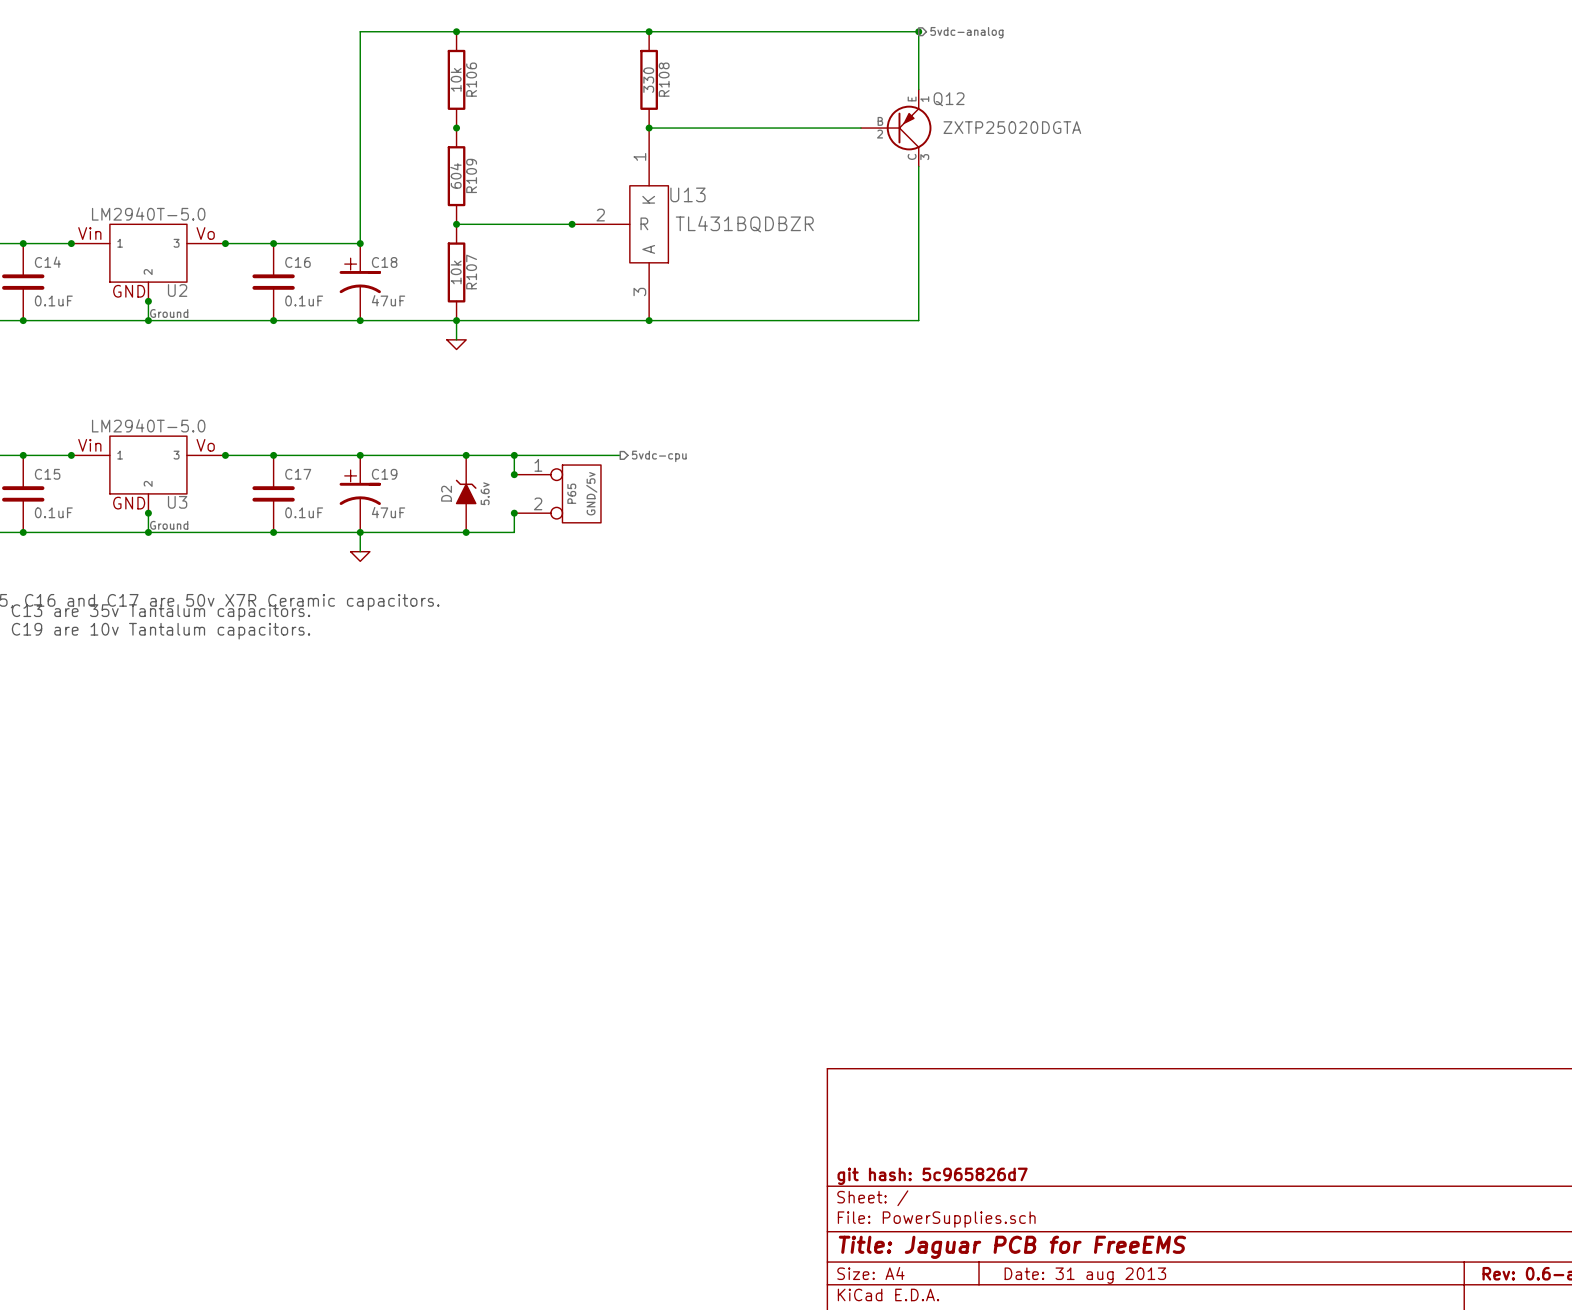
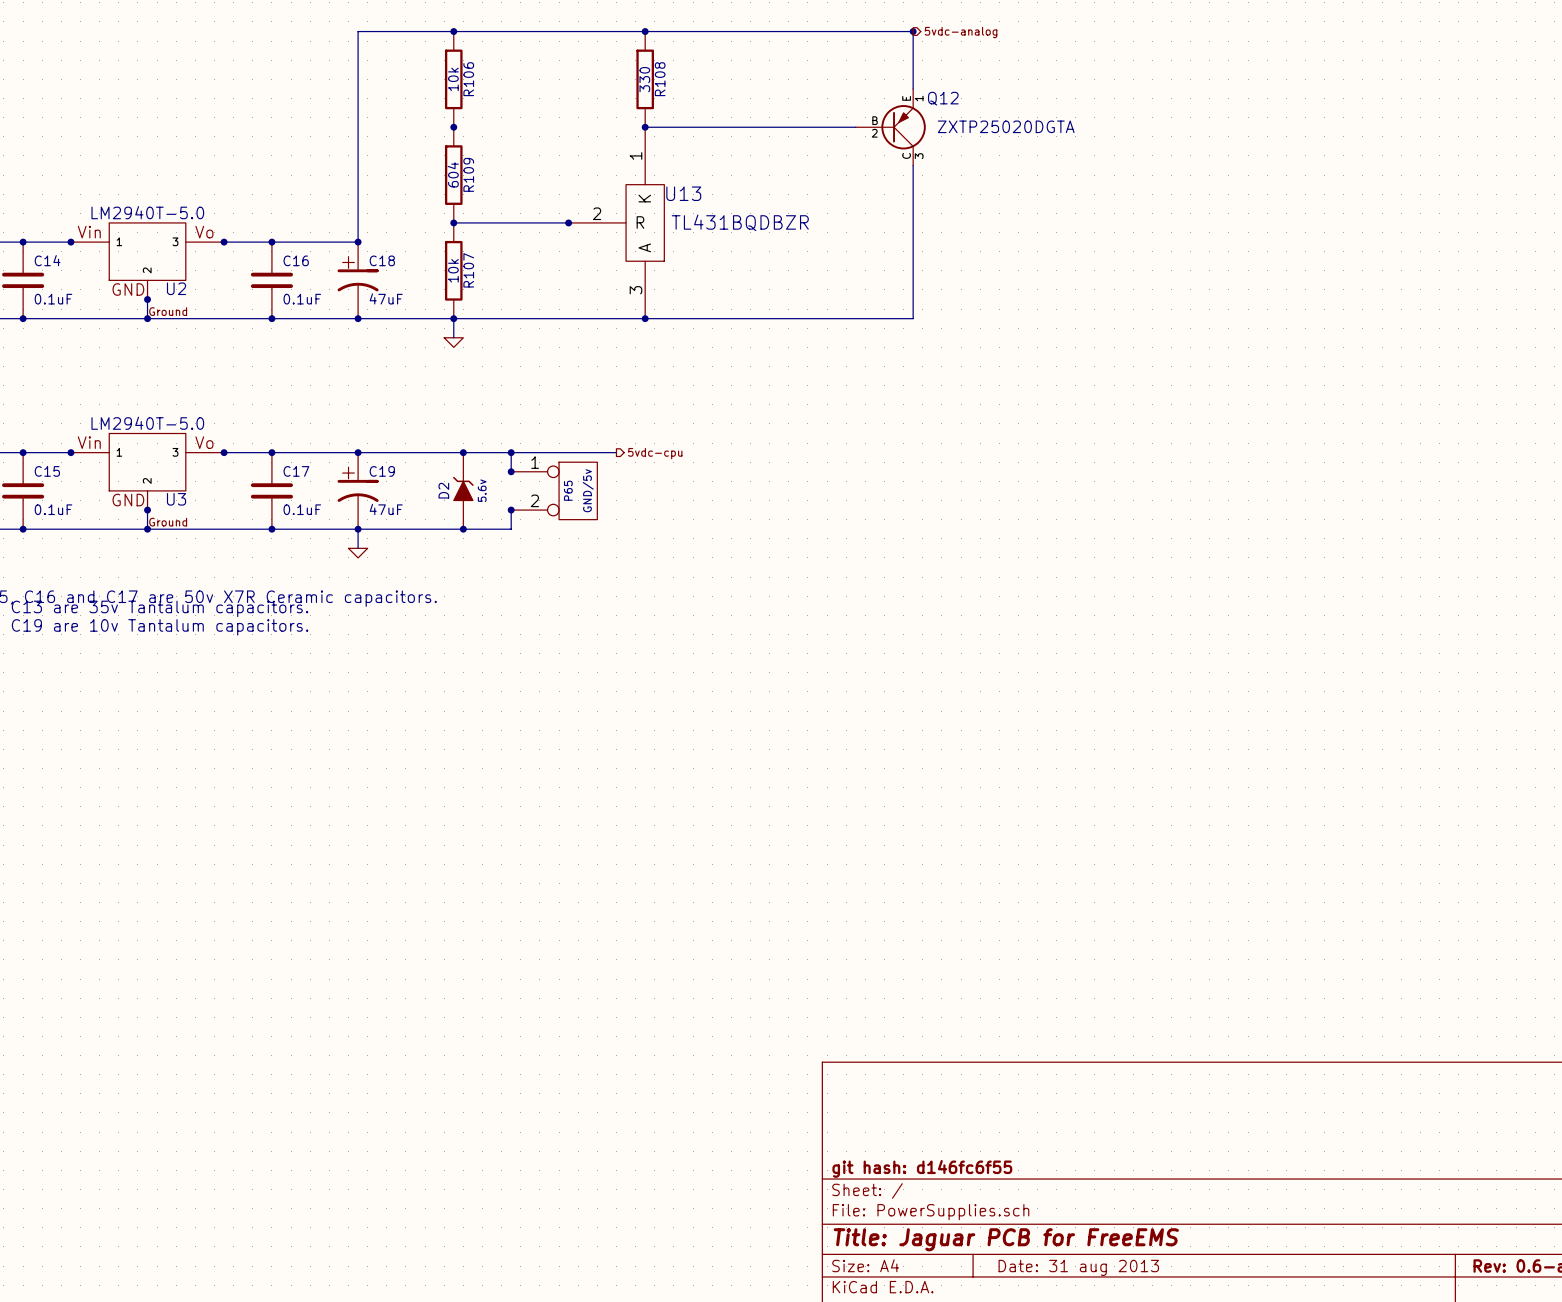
title block: git hash: 5c965826d7 (932, 1176) -> git hash: d146fc6f55 (922, 1168)

